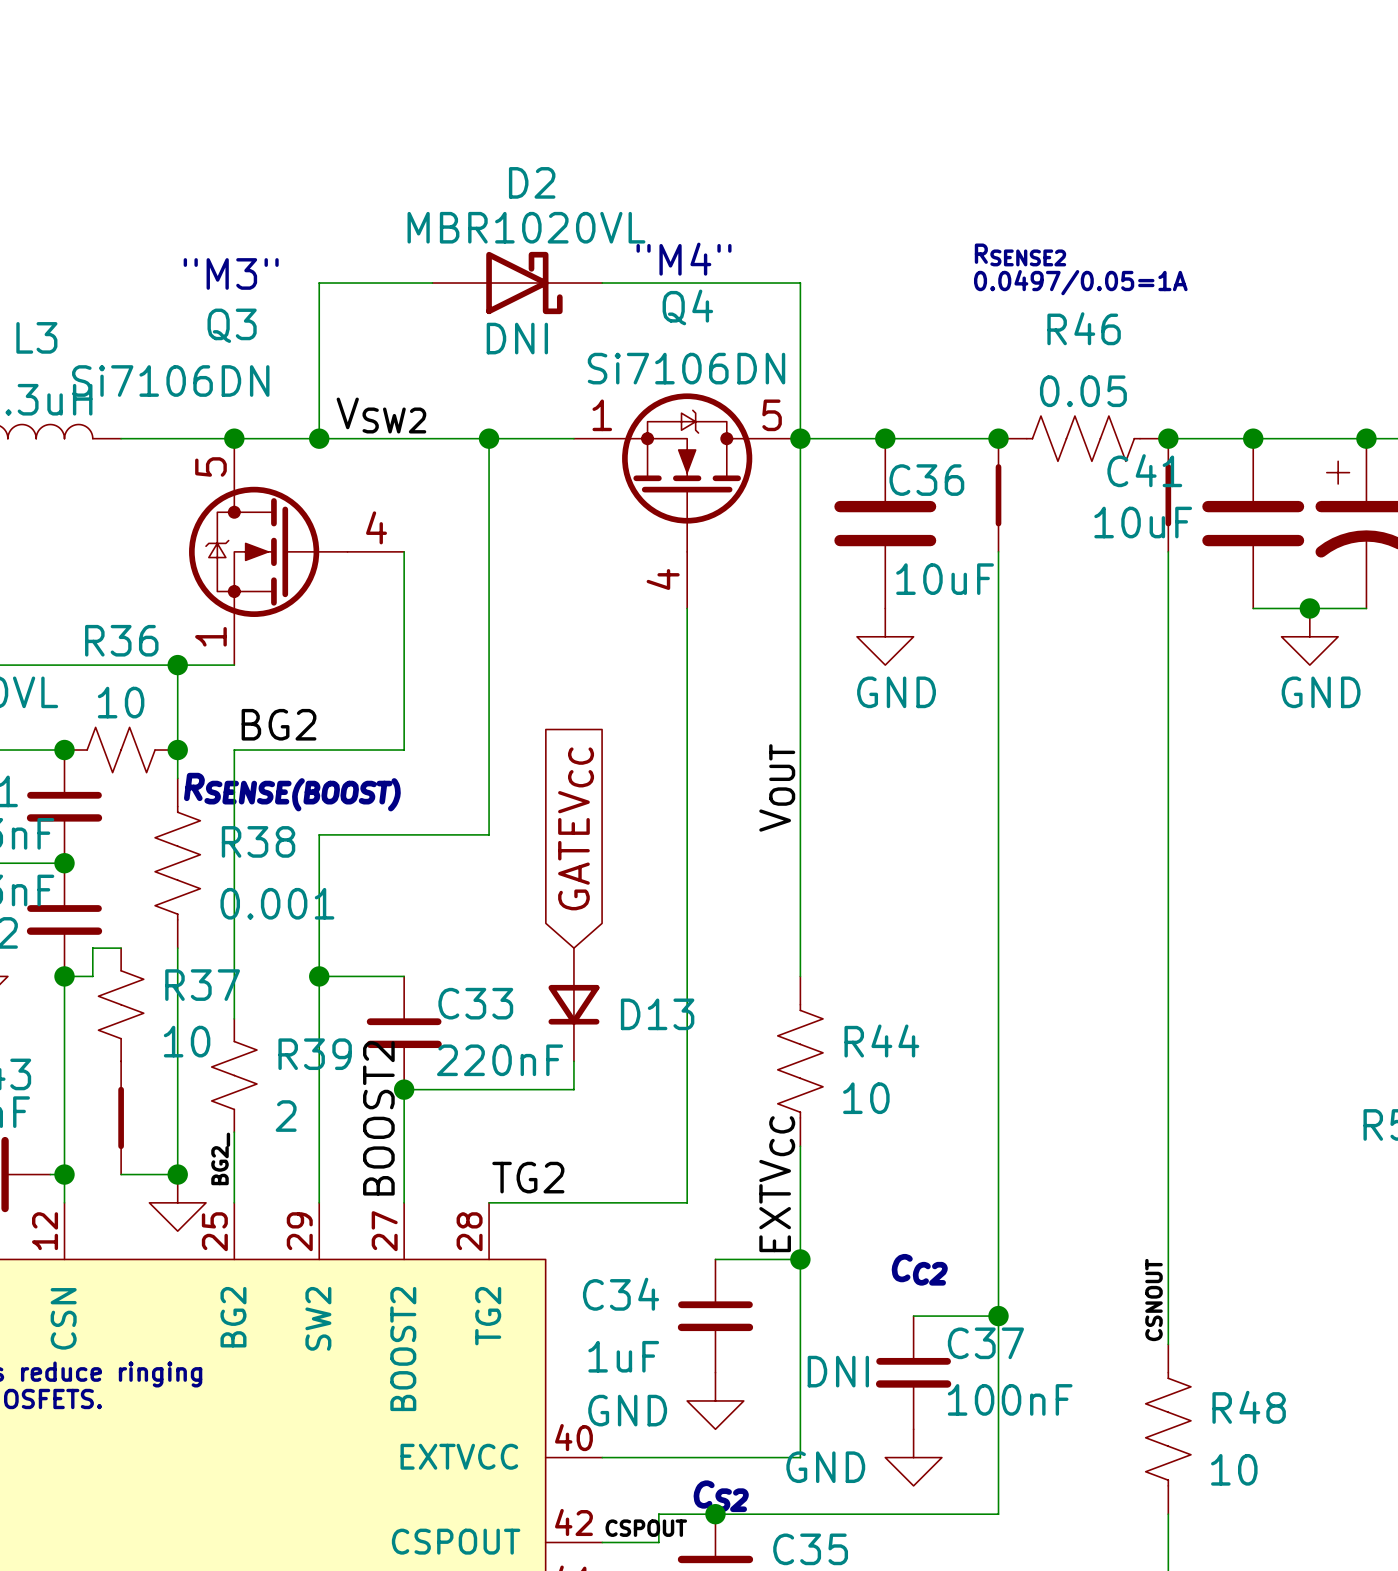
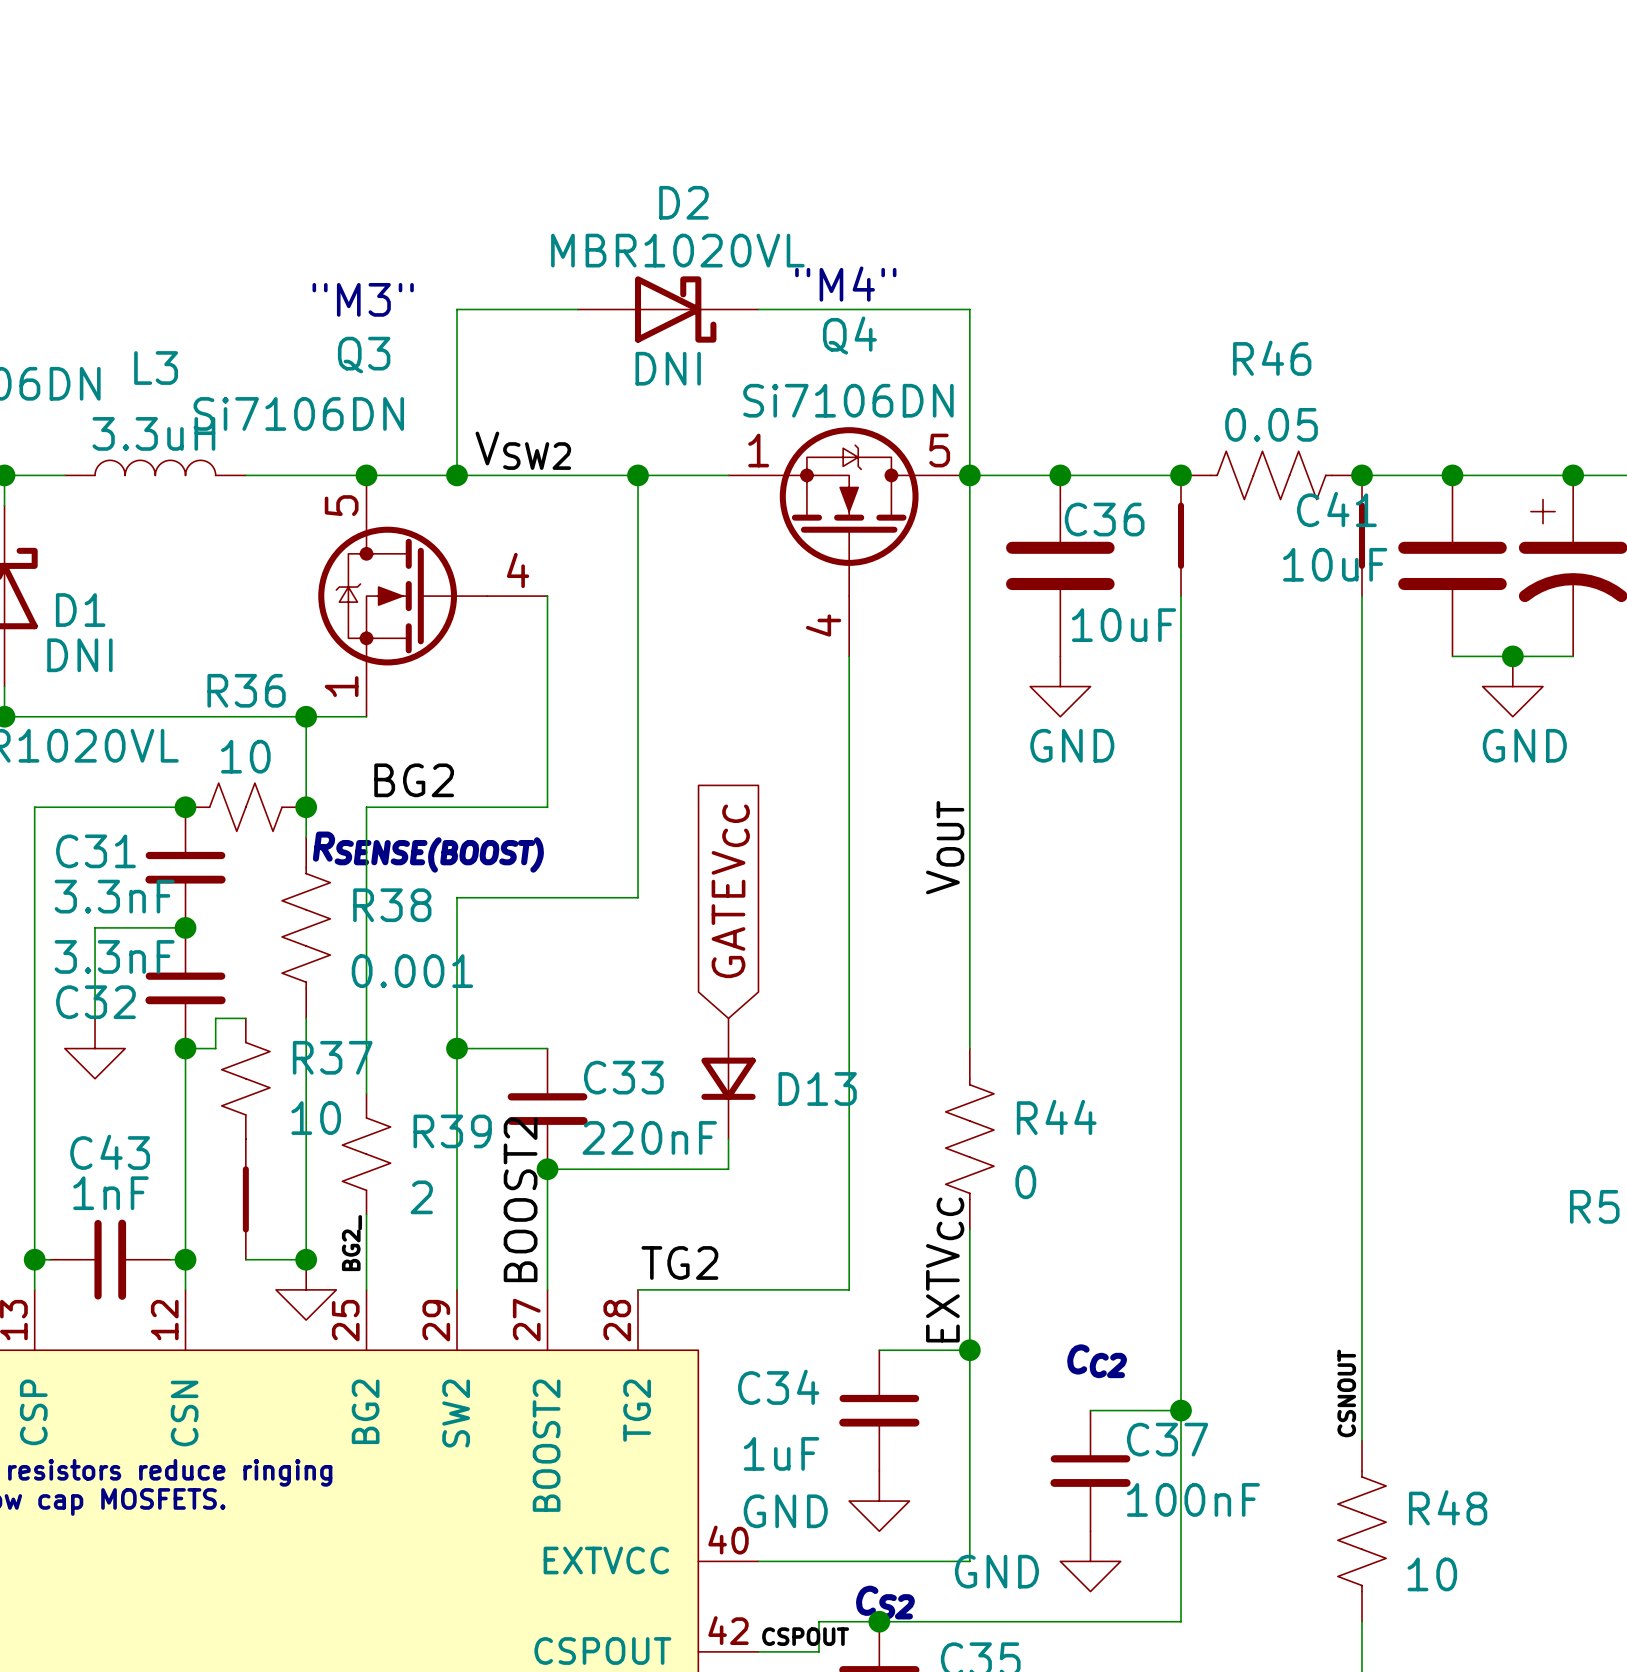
text: RSENSE2 (1020, 254) -> none
text: 0.0497/0.05=1A (1080, 282) -> none
R44 value: 10 (866, 1098) -> 0 (1025, 1182)
C37 text: DNI (838, 1371) -> none

